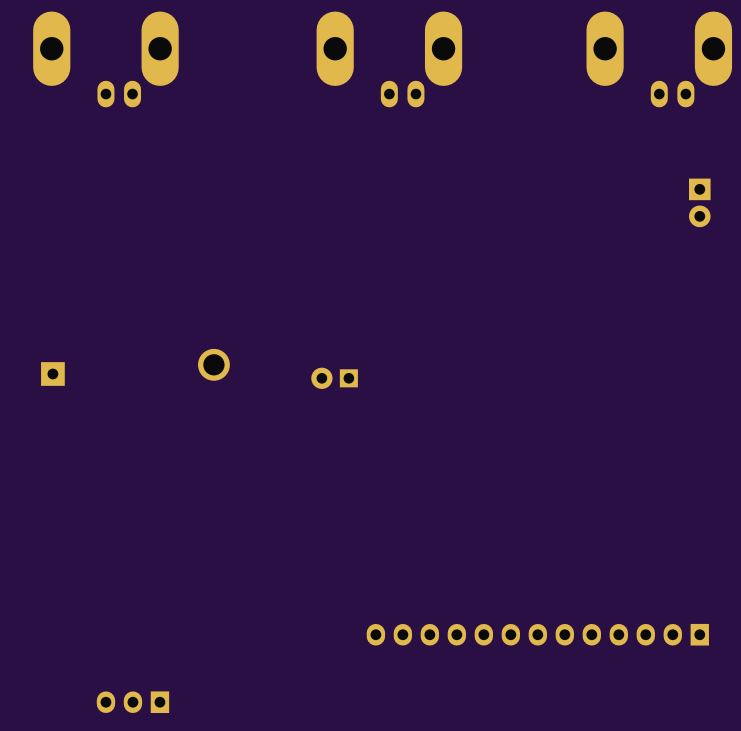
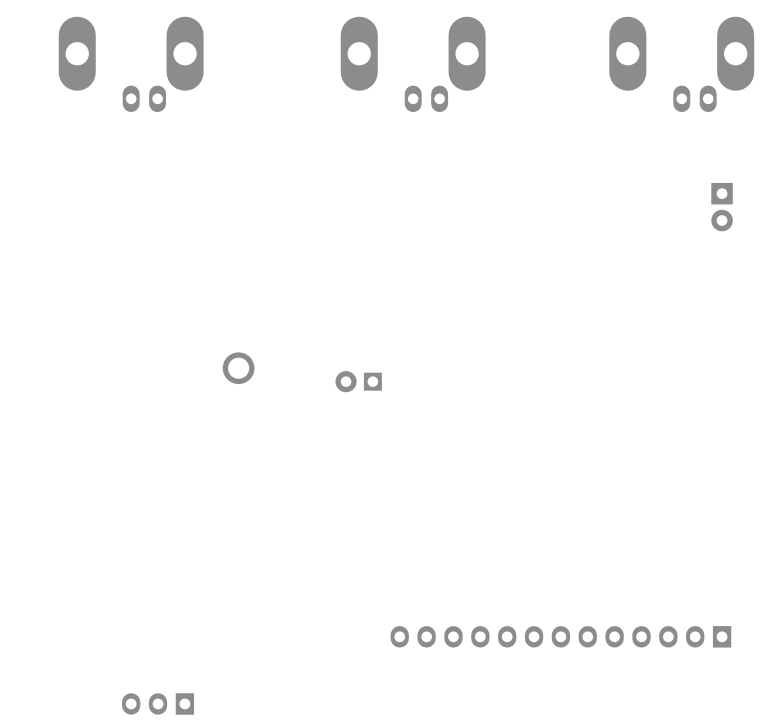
part: (52, 373) -> none

